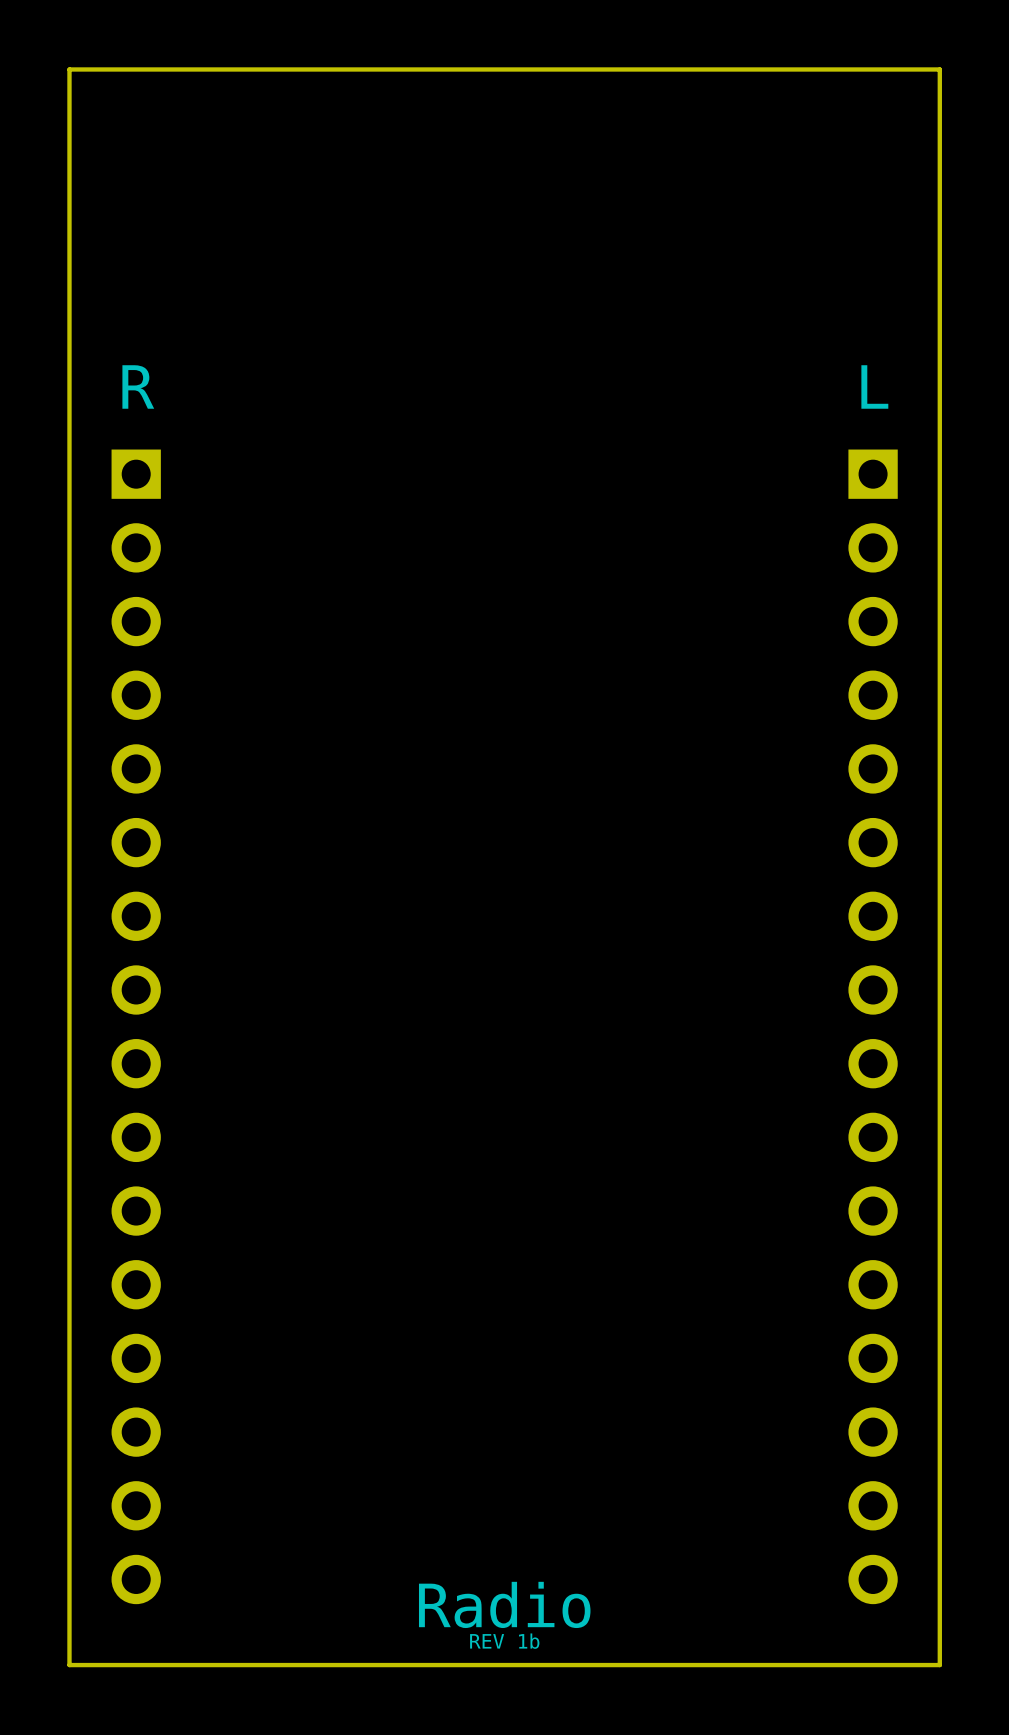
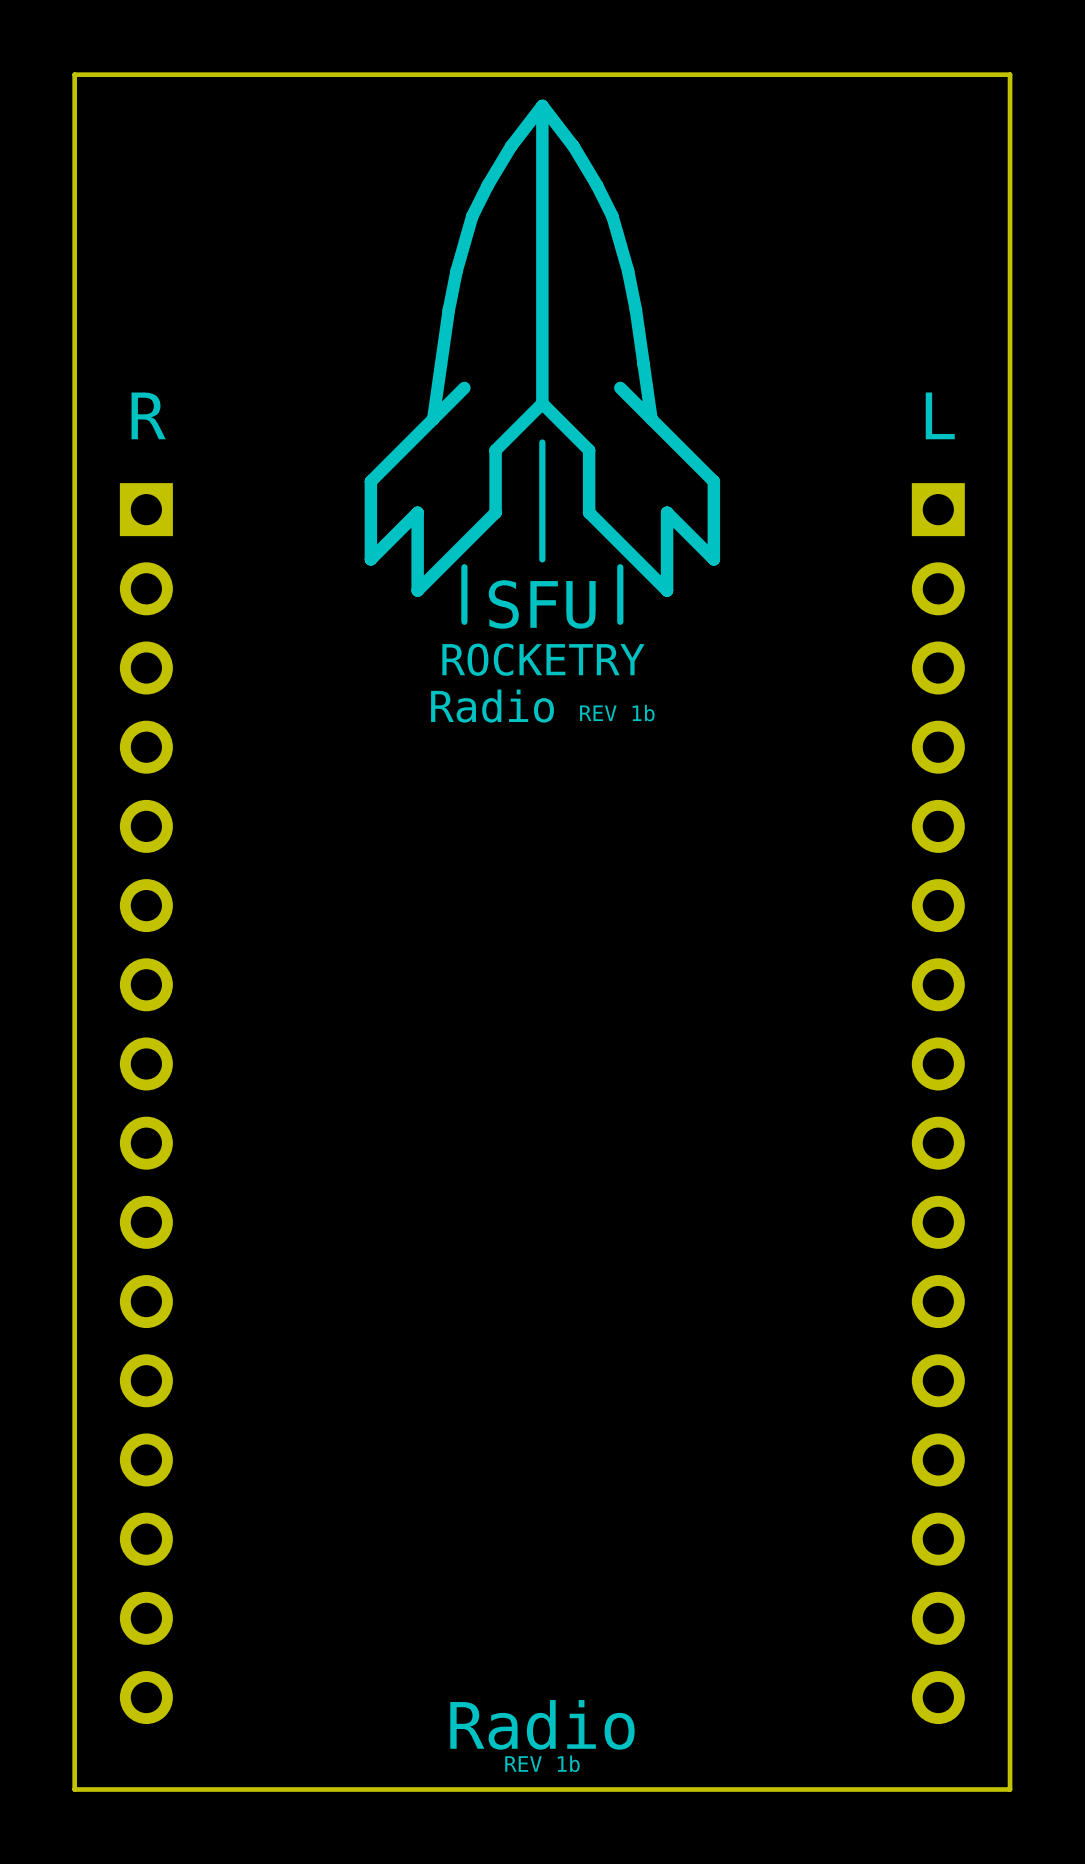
line: none -> (542, 107) (542, 403)
line: none -> (464, 387) (370, 481) (370, 559) (417, 512) (417, 590) (495, 512) (495, 450) (542, 403)
line: none -> (620, 387) (713, 481) (713, 559) (667, 512) (667, 590) (589, 512) (589, 450) (542, 403)
line: none -> (651, 419) (635, 309) (628, 271) (612, 216) (596, 185) (573, 146) (542, 105) (511, 146) (487, 185) (472, 216) (456, 271) (448, 309) (433, 419)
line: none -> (542, 442) (542, 559)
line: none -> (464, 567) (464, 621)
line: none -> (620, 567) (620, 621)
text: none -> SFU (542, 604)
text: none -> ROCKETRY (543, 659)
text: none -> Radio (492, 706)
text: none -> REV 1b (617, 713)

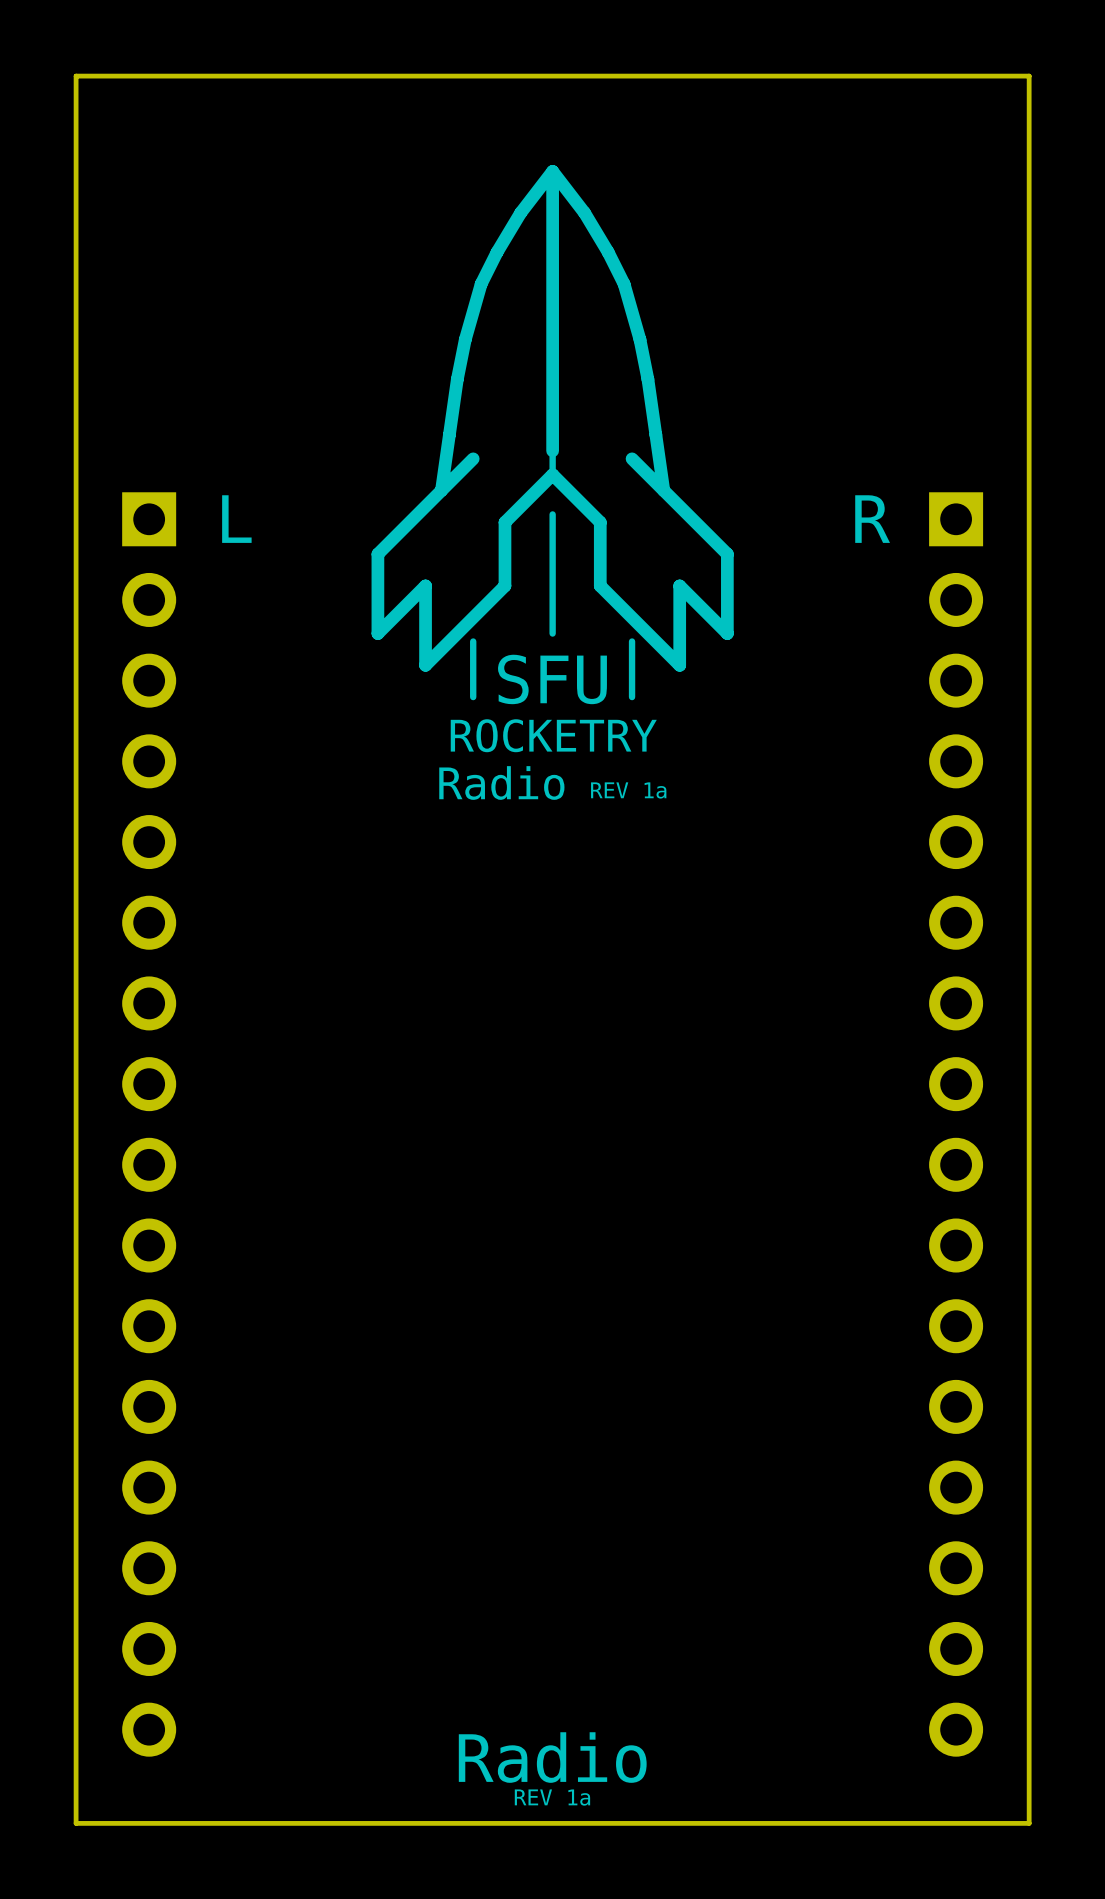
line: (542, 107) (542, 169) -> (552, 570) (552, 633)
line: (464, 387) (370, 481) (370, 543) -> (473, 458) (377, 554)
line: (620, 387) (713, 481) (713, 543) -> (632, 458) (727, 554)
text position: R (148, 415) -> R (872, 519)
text position: L (940, 415) -> L (236, 519)
line: (651, 419) (635, 309) (628, 271) (612, 216) (596, 185) (573, 146) (542, 105) (511, 146) (487, 185) (472, 216) (456, 271) (448, 309) (433, 419) -> (663, 490) (647, 379) (639, 339) (624, 284) (608, 252) (584, 212) (552, 171) (520, 212) (497, 252) (481, 284) (465, 339) (457, 379) (441, 490)
line: (542, 465) (542, 504) -> (552, 411) (552, 450)
line: (370, 559) (417, 512) (417, 575) -> (377, 570) (377, 633) (425, 585)
line: (713, 559) (667, 512) (667, 575) -> (727, 570) (727, 633) (679, 585)
line: (464, 567) (464, 621) -> (473, 641) (473, 697)
line: (620, 567) (620, 621) -> (632, 641) (632, 697)
line: (667, 590) (589, 512) (589, 450) (542, 403) (495, 450) (495, 512) (417, 590) -> (679, 601) (679, 665) (600, 585) (600, 522) (552, 474) (504, 522) (504, 585) (425, 665) (425, 601)
text position: SFU (542, 604) -> SFU (552, 679)
text position: ROCKETRY (543, 659) -> ROCKETRY (553, 735)
text position: Radio (492, 706) -> Radio (501, 782)
text: REV 1b (617, 713) -> none
text: none -> REV 1a (628, 790)
text: REV 1b (542, 1763) -> REV 1a (552, 1797)

